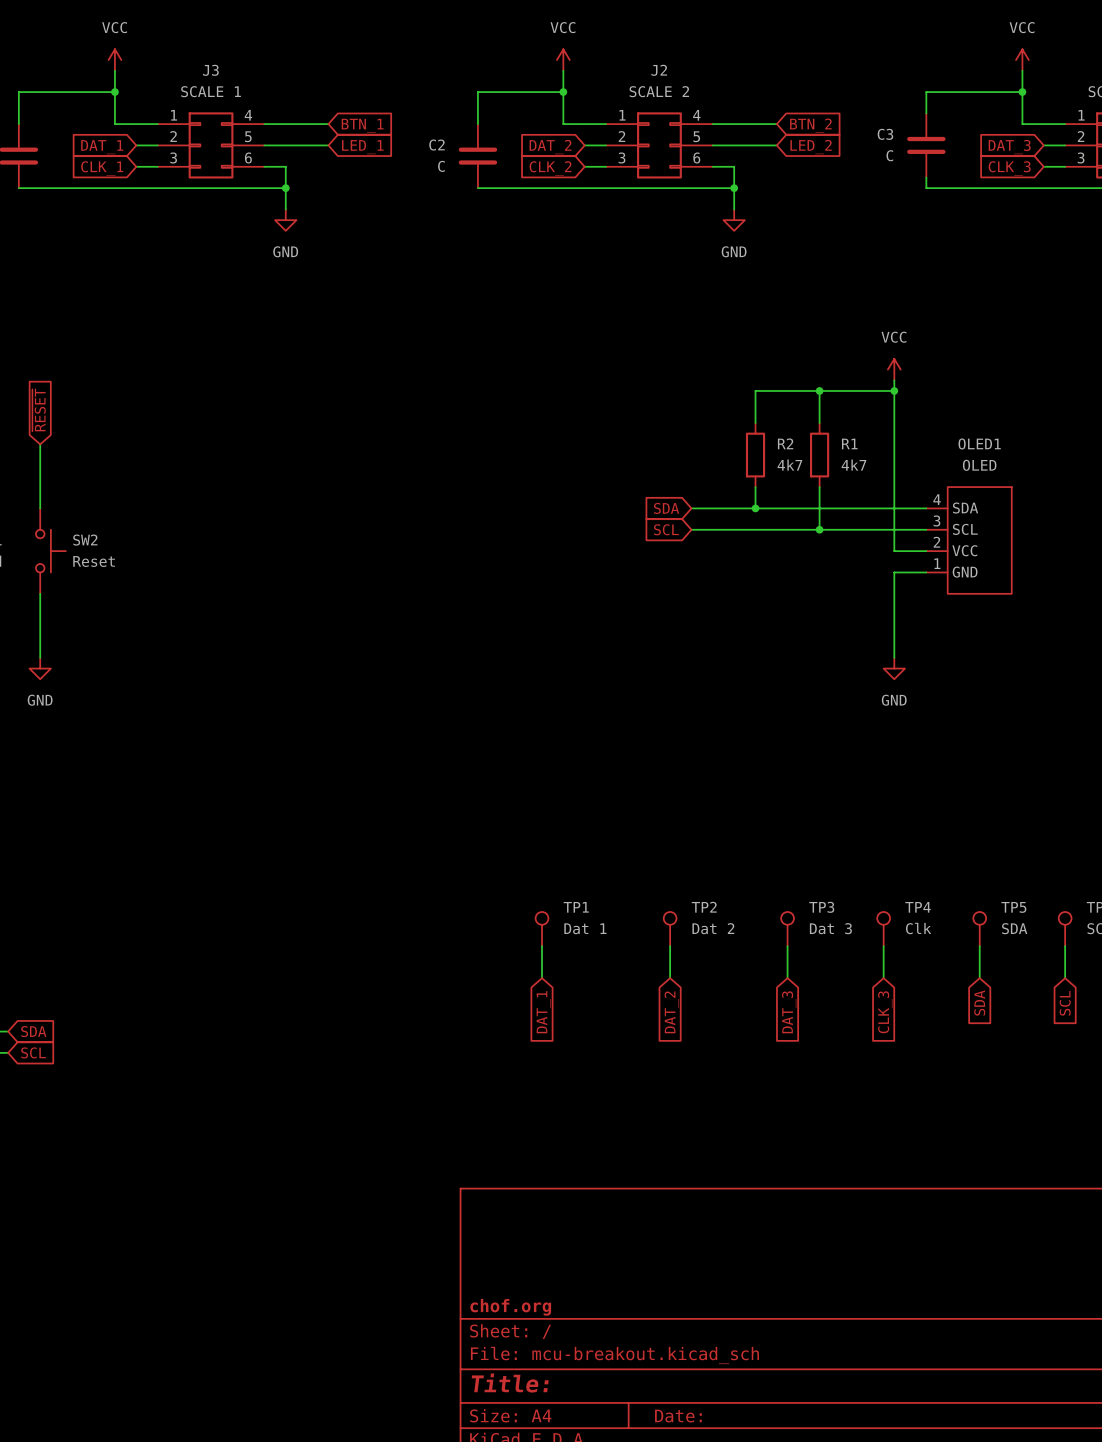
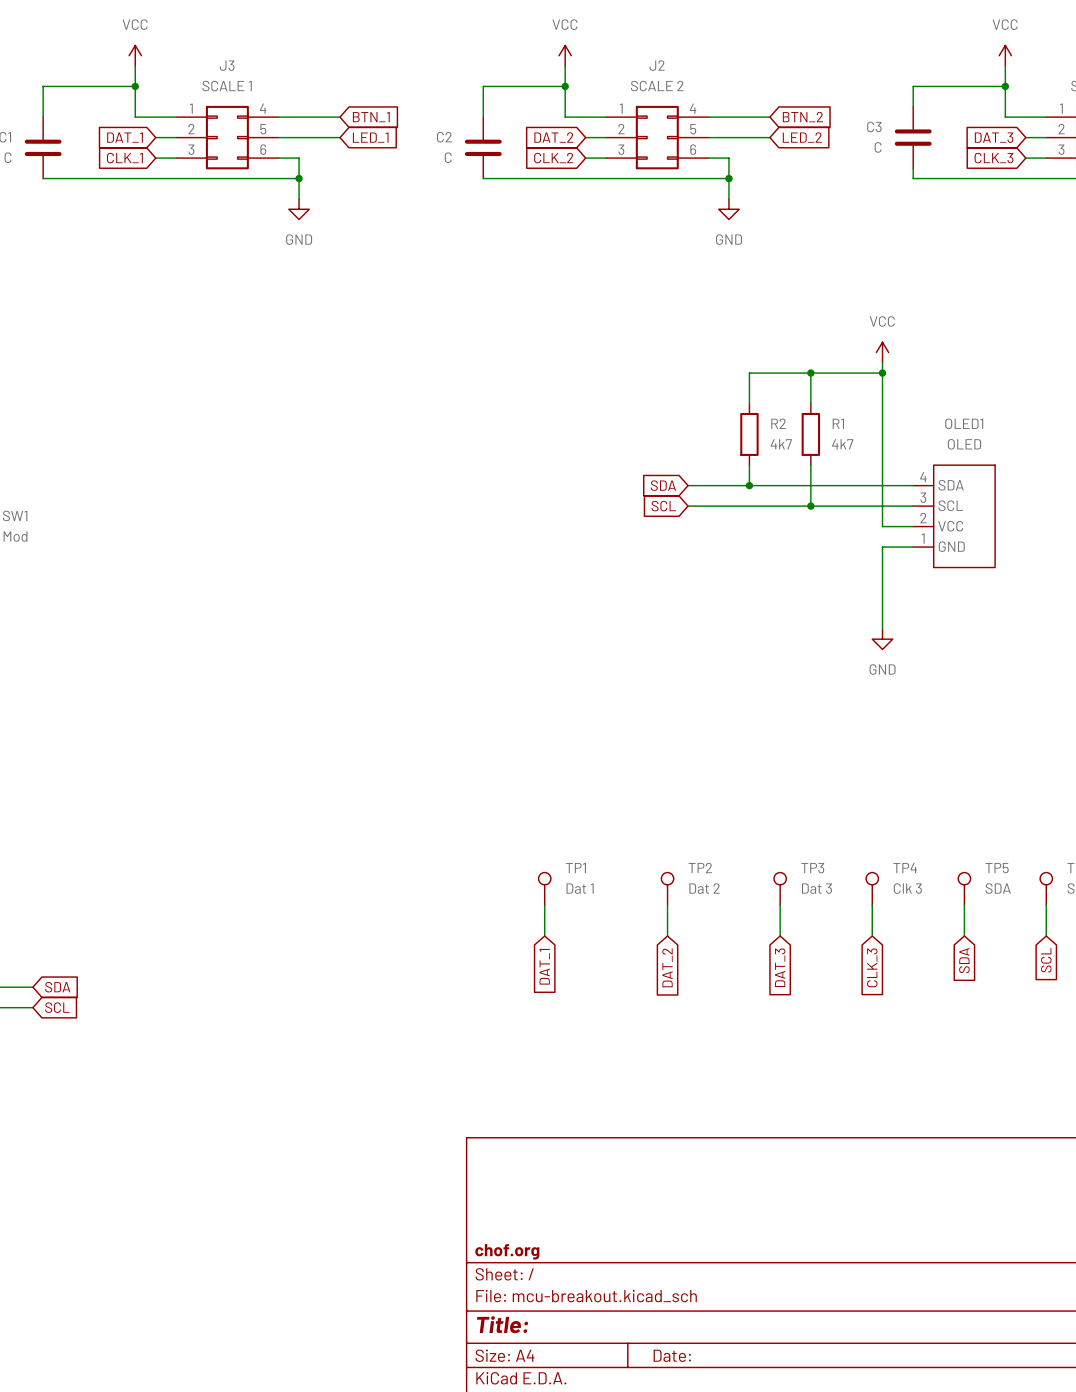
global label: ~{RESET} (39, 409) -> none
wire: (40, 444) (40, 508) -> none
SW2: Reset (50, 551) -> none
wire: (40, 593) (40, 657) -> none
power symbol: GND (40, 668) -> none
TP4 value: Clk (918, 928) -> Clk 3 (907, 888)

